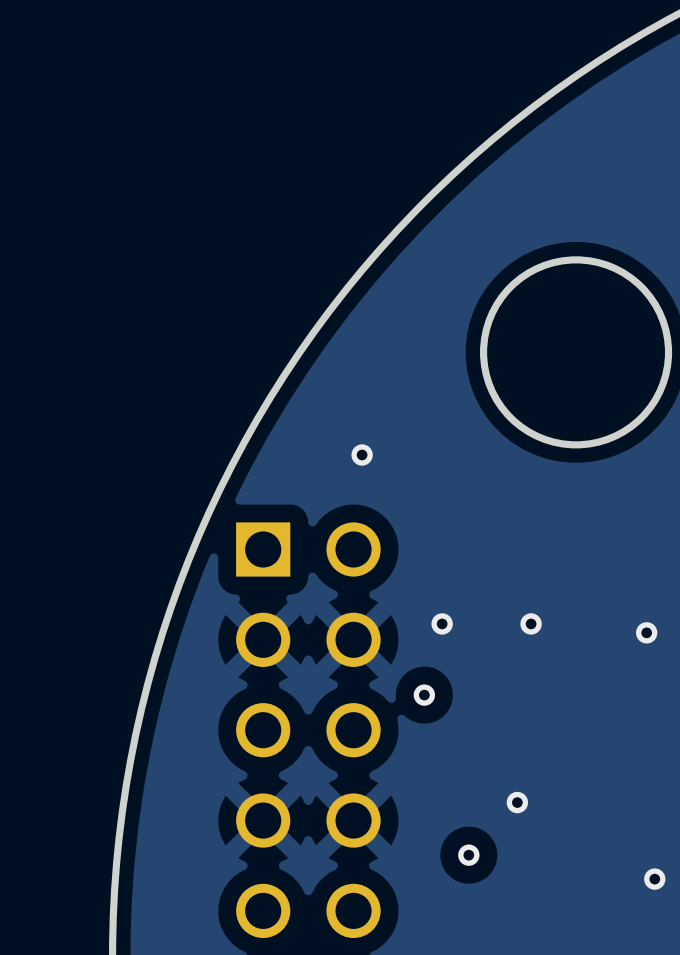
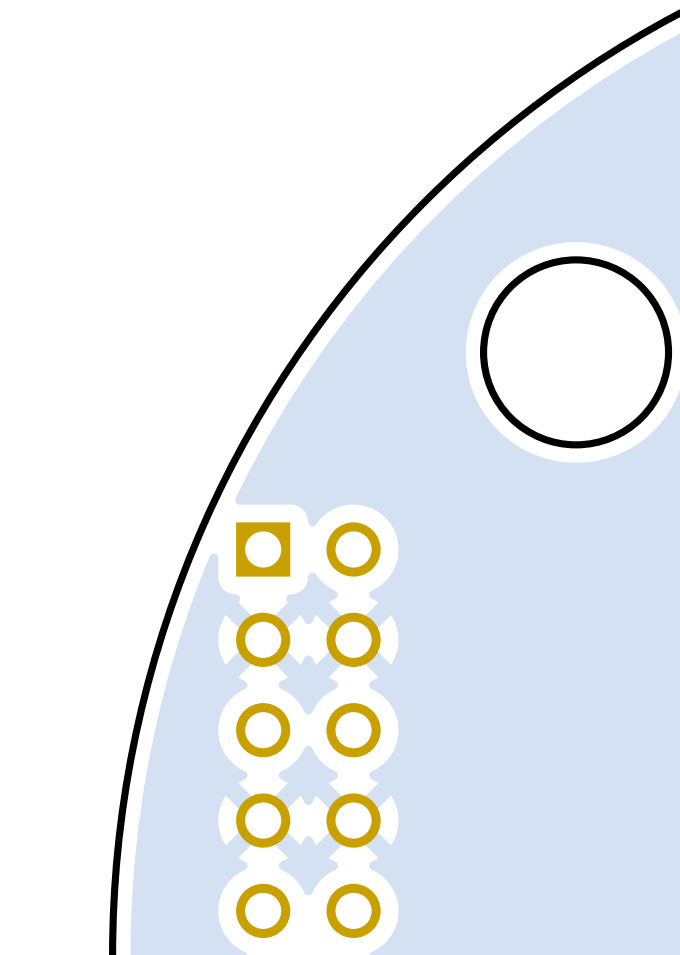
via: (362, 454) -> none
via: (442, 623) -> none
via: (531, 623) -> none
via: (646, 632) -> none
via: (424, 695) -> none
via: (517, 802) -> none
via: (468, 855) -> none
via: (654, 879) -> none

